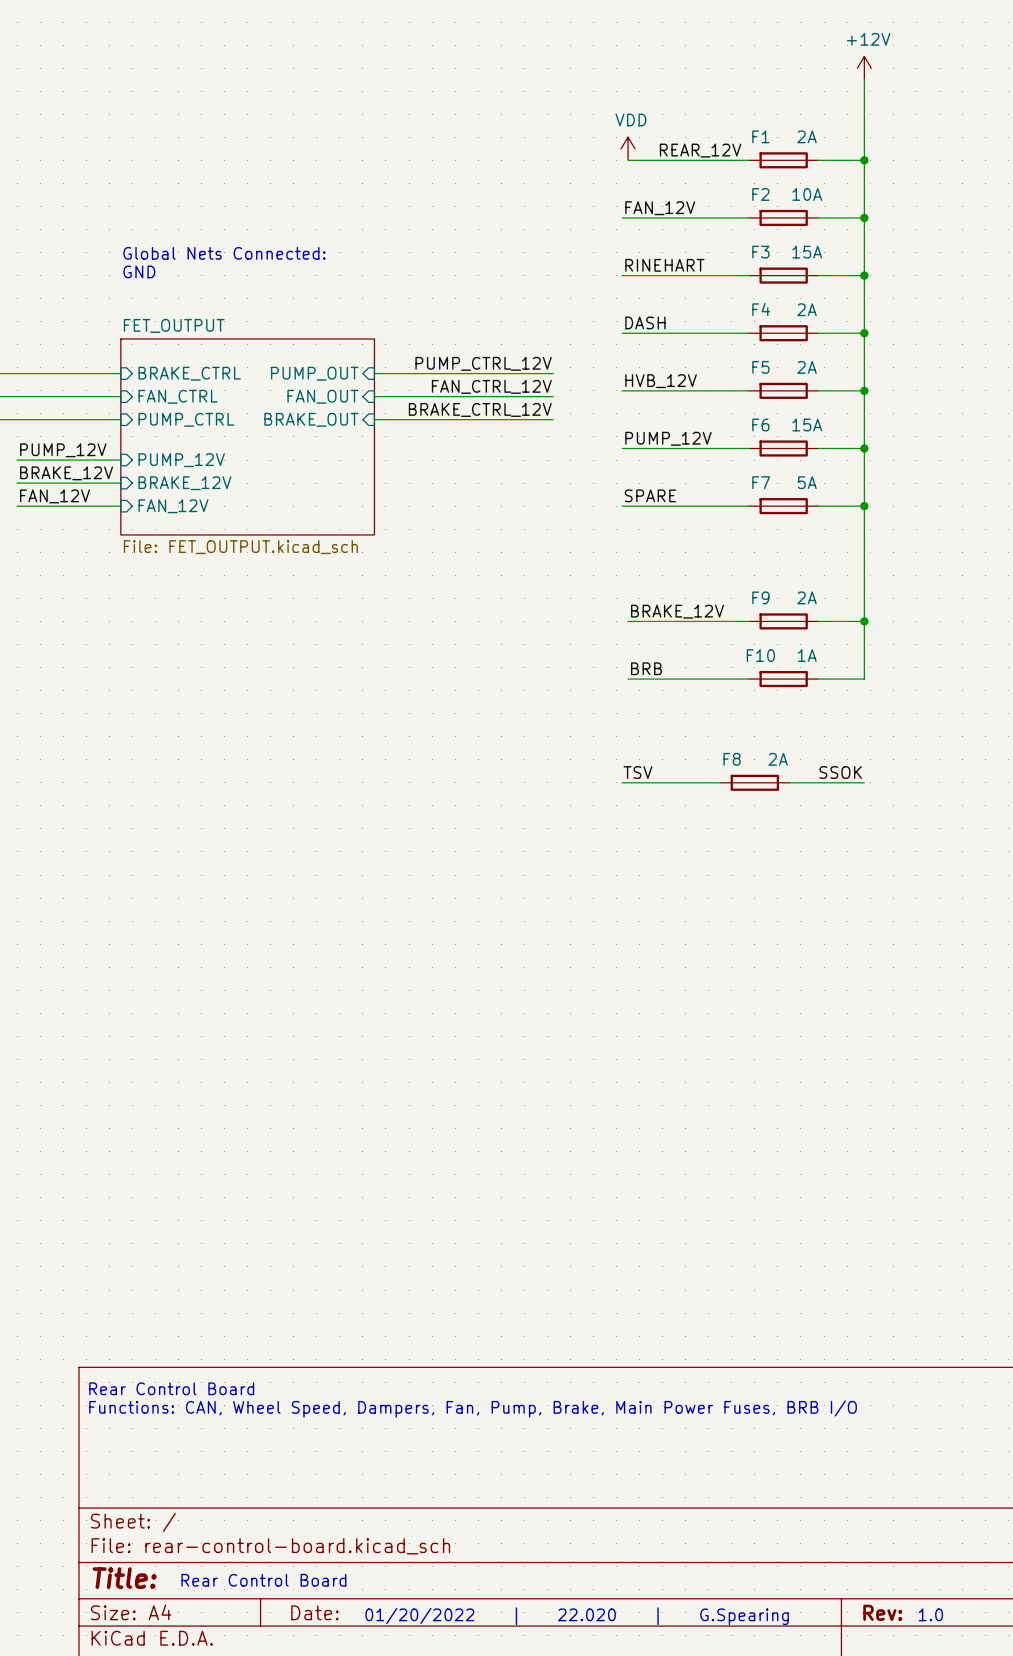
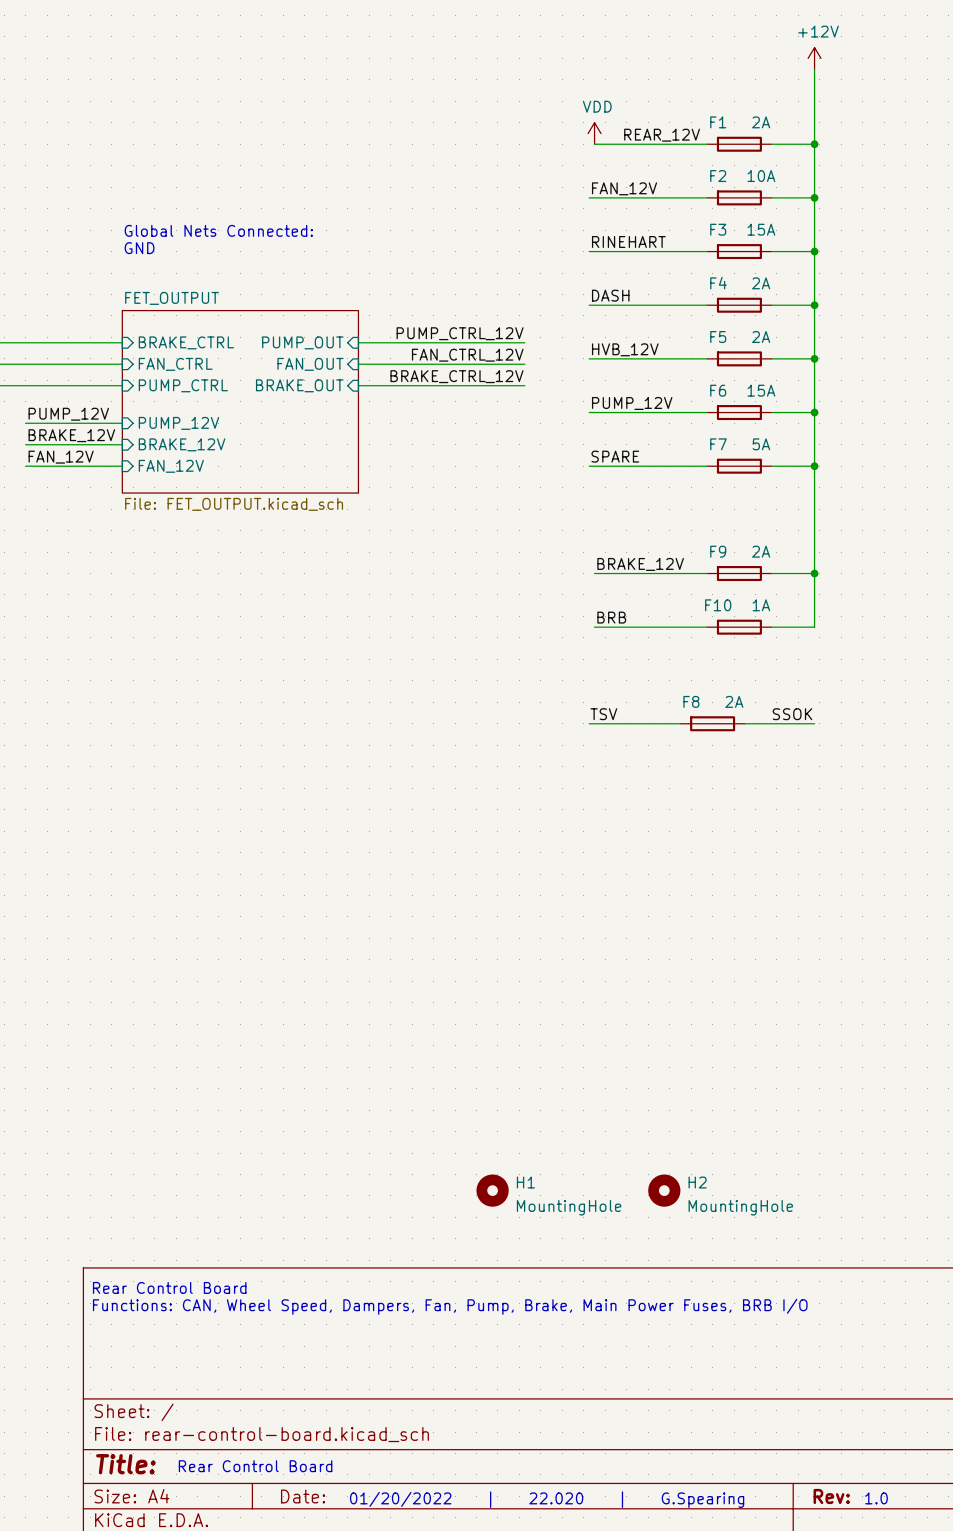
H1: none -> MountingHole (492, 1190)
H2: none -> MountingHole (664, 1190)

